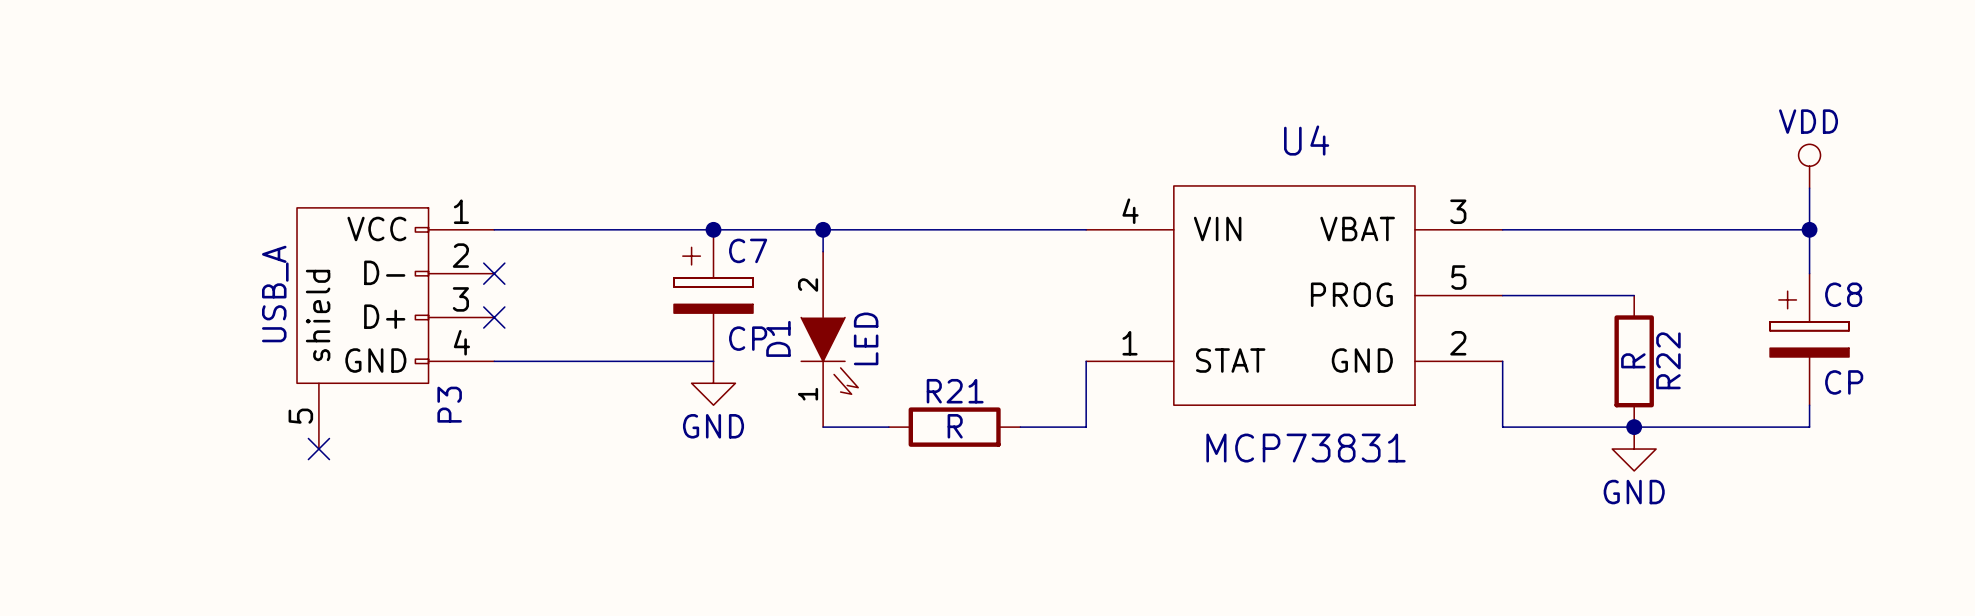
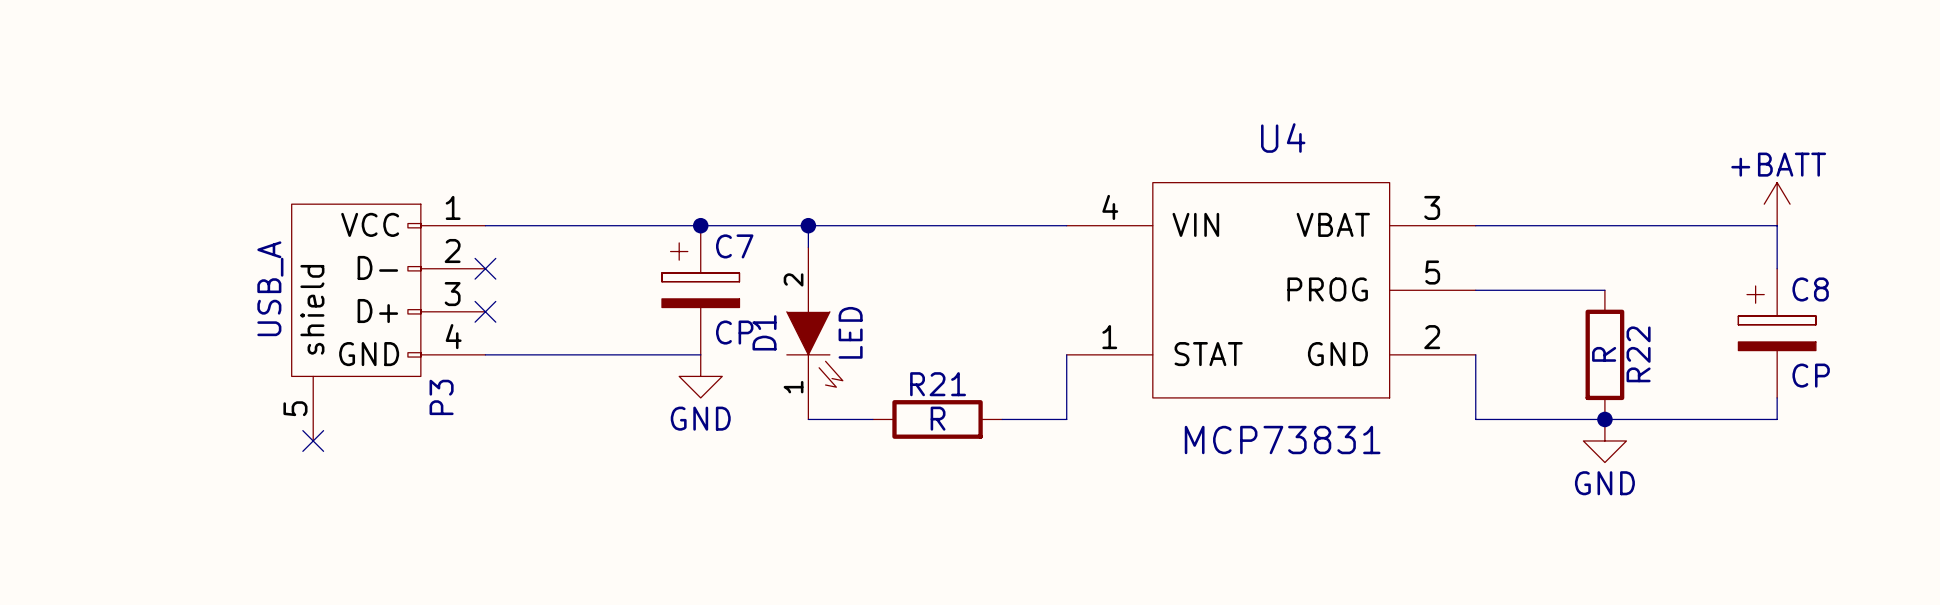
power symbol: VDD (1809, 166) -> none
power symbol: none -> +BATT (1777, 204)
junction: (1809, 229) -> none

